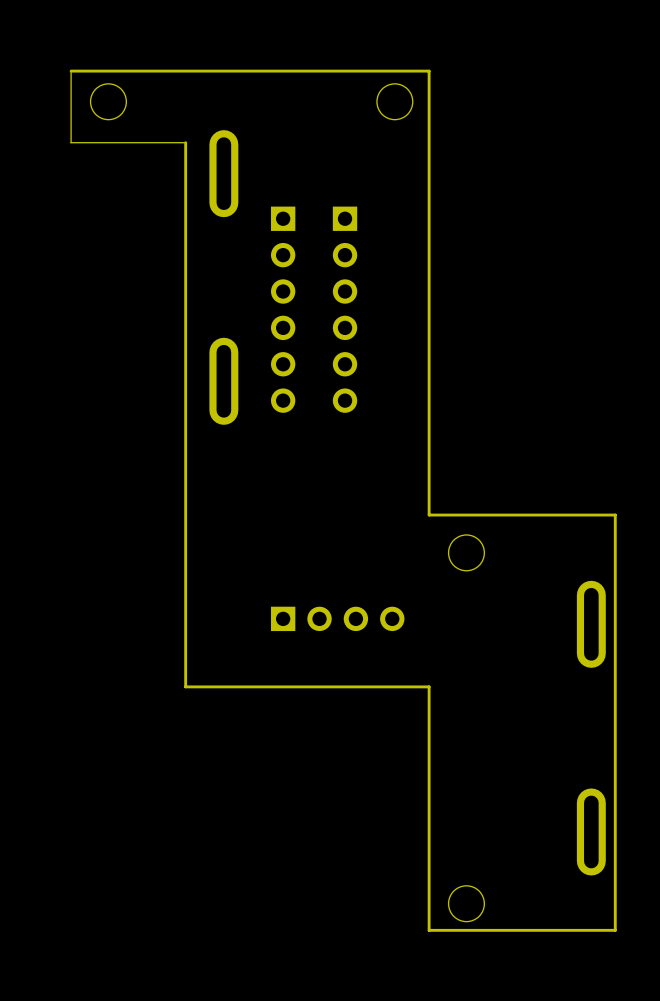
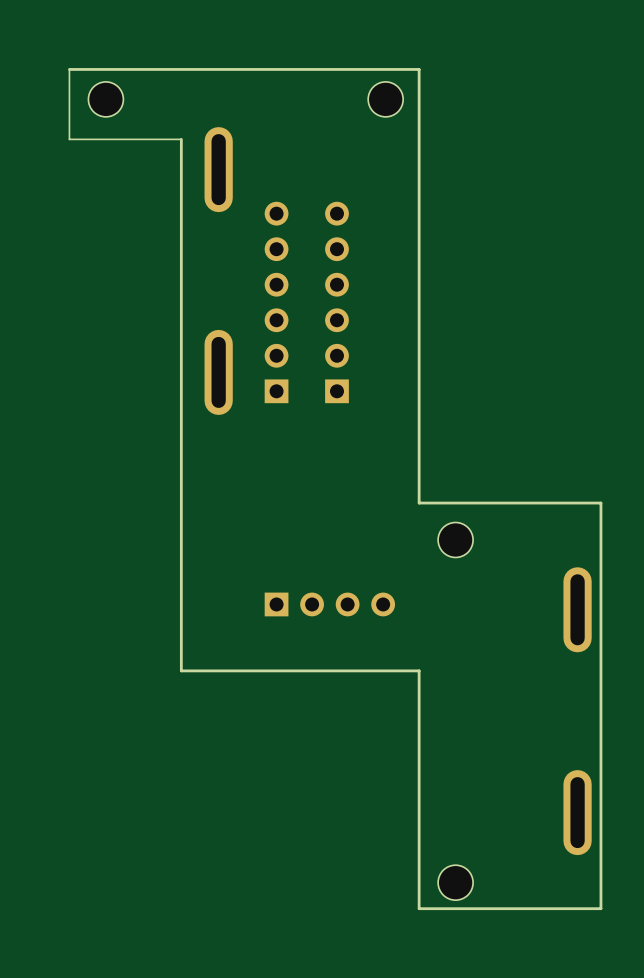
part rotation: 0° (283, 309) -> 180° (276, 302)
part rotation: 0° (345, 309) -> 180° (336, 302)

